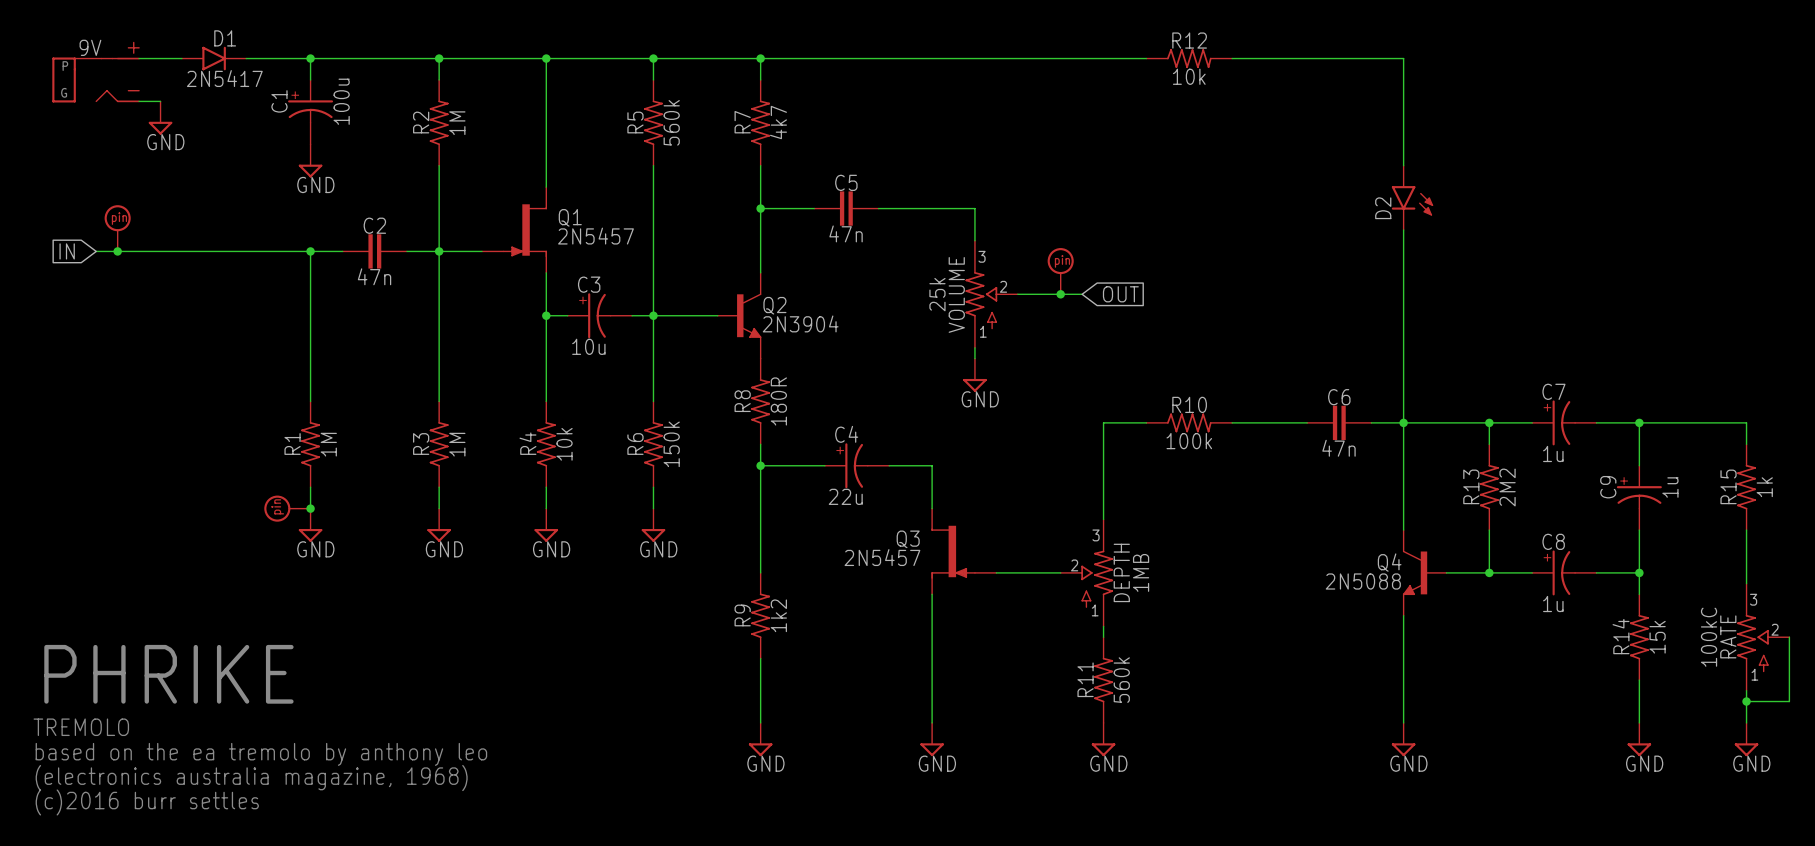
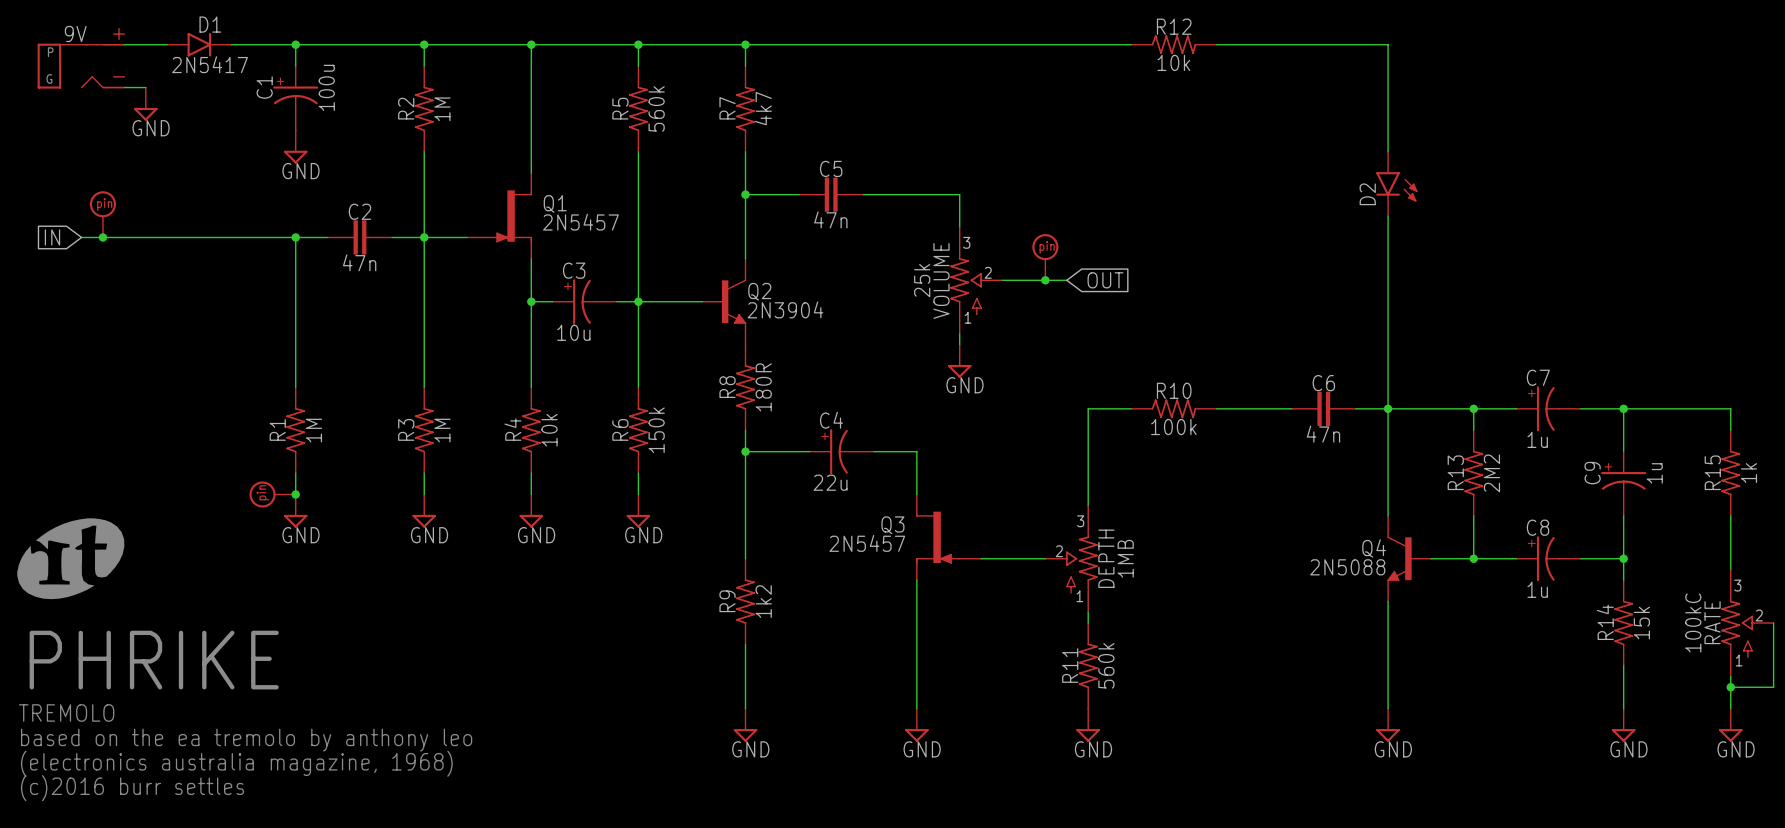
part: none -> (70, 558)

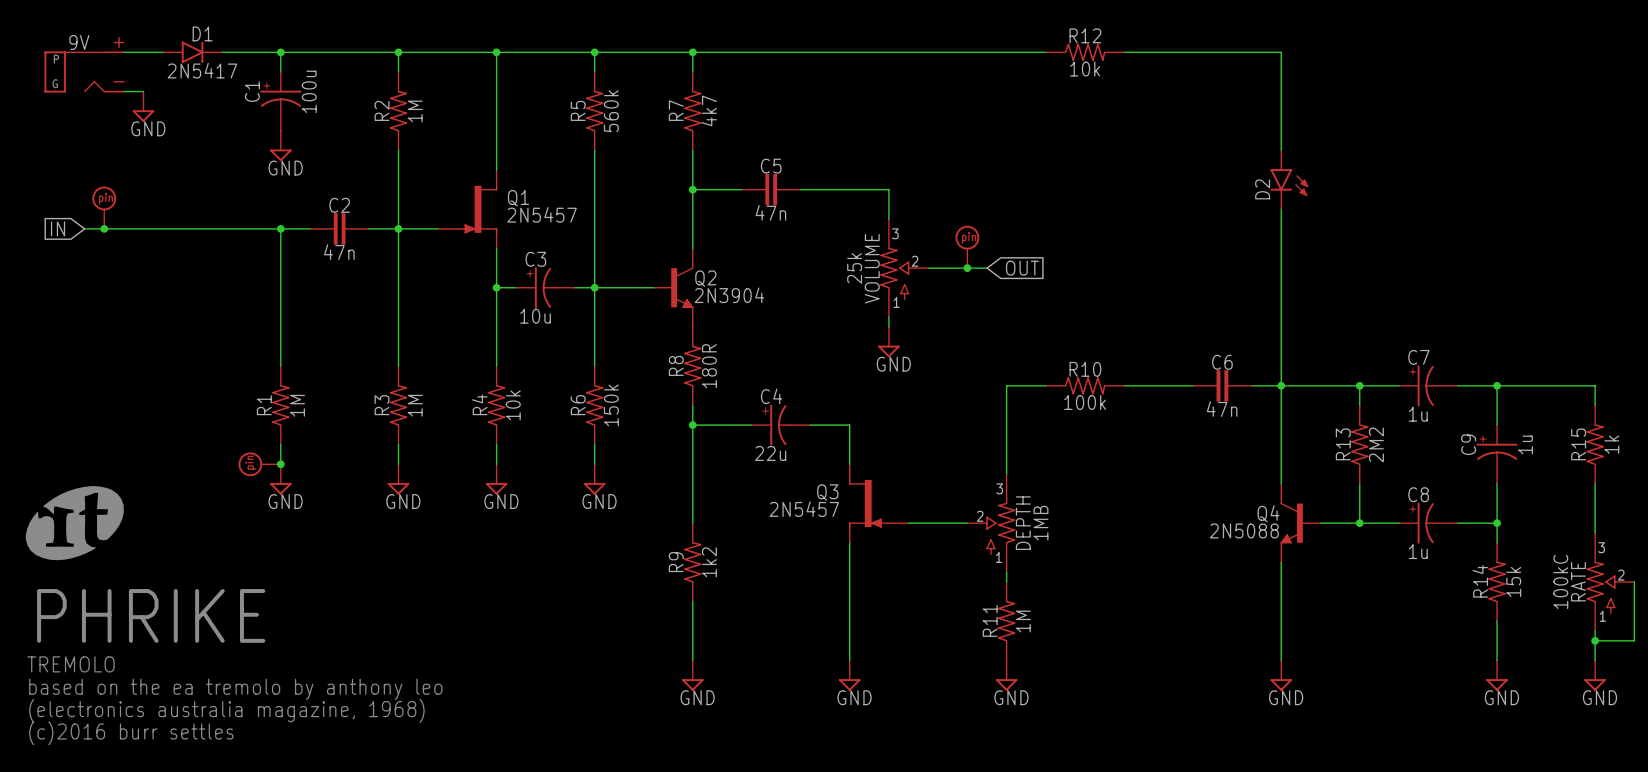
R11 value: 560k (1106, 665) -> 1M (1023, 621)

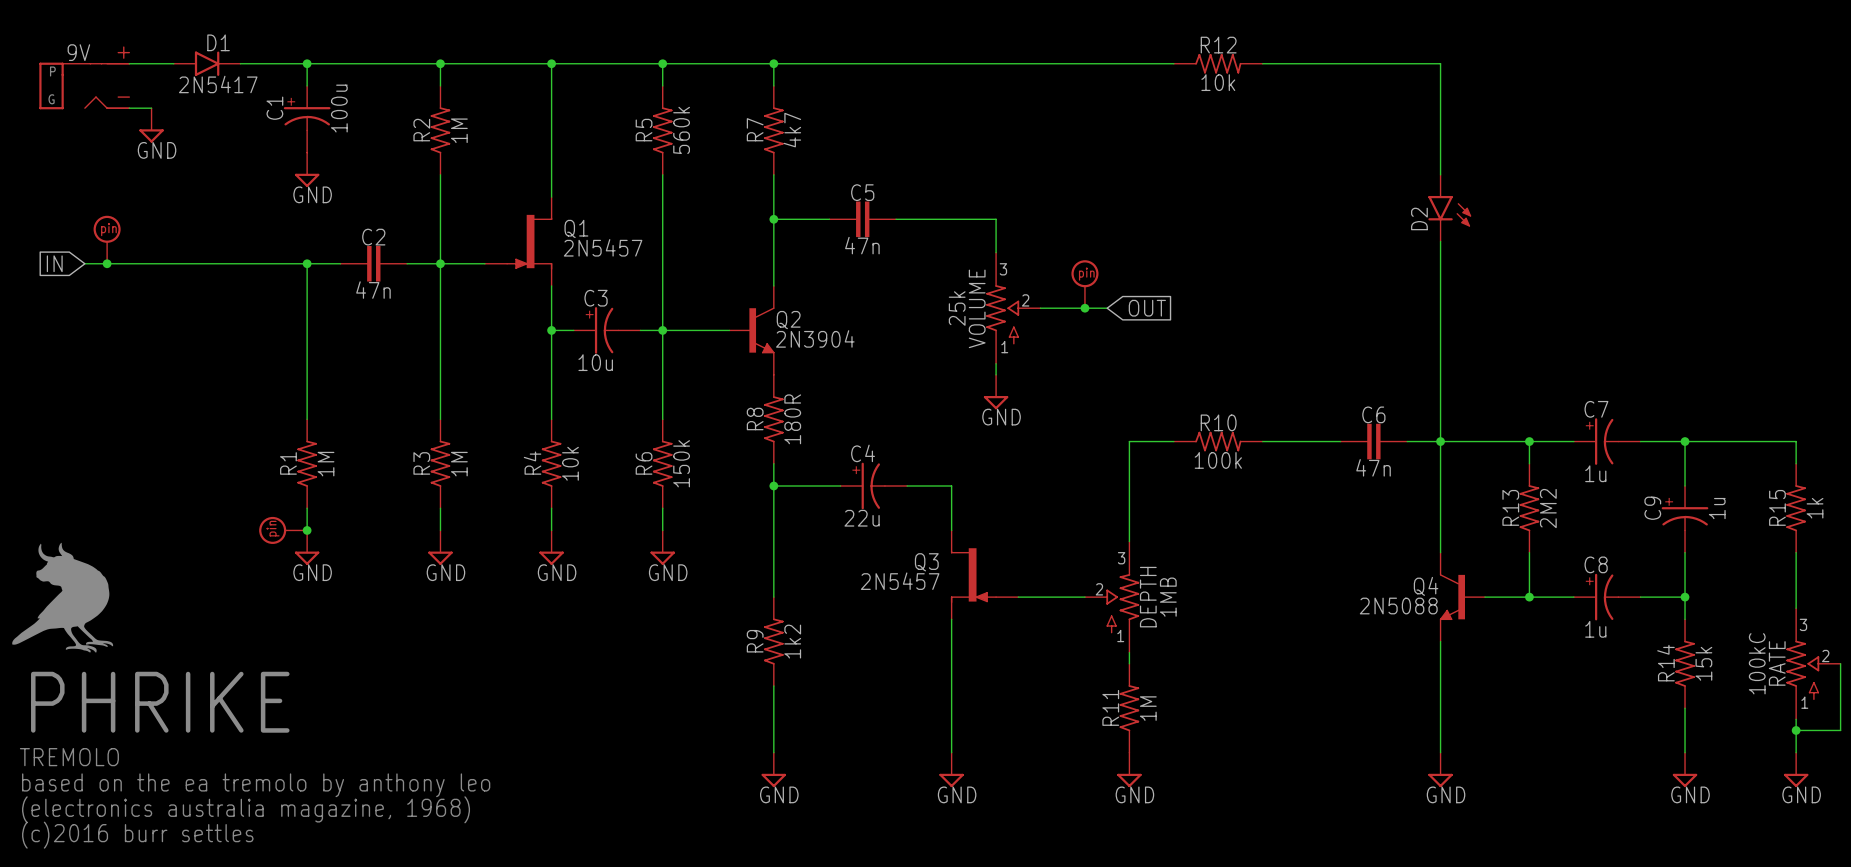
part: none -> (62, 597)
part: (74, 523) -> none

